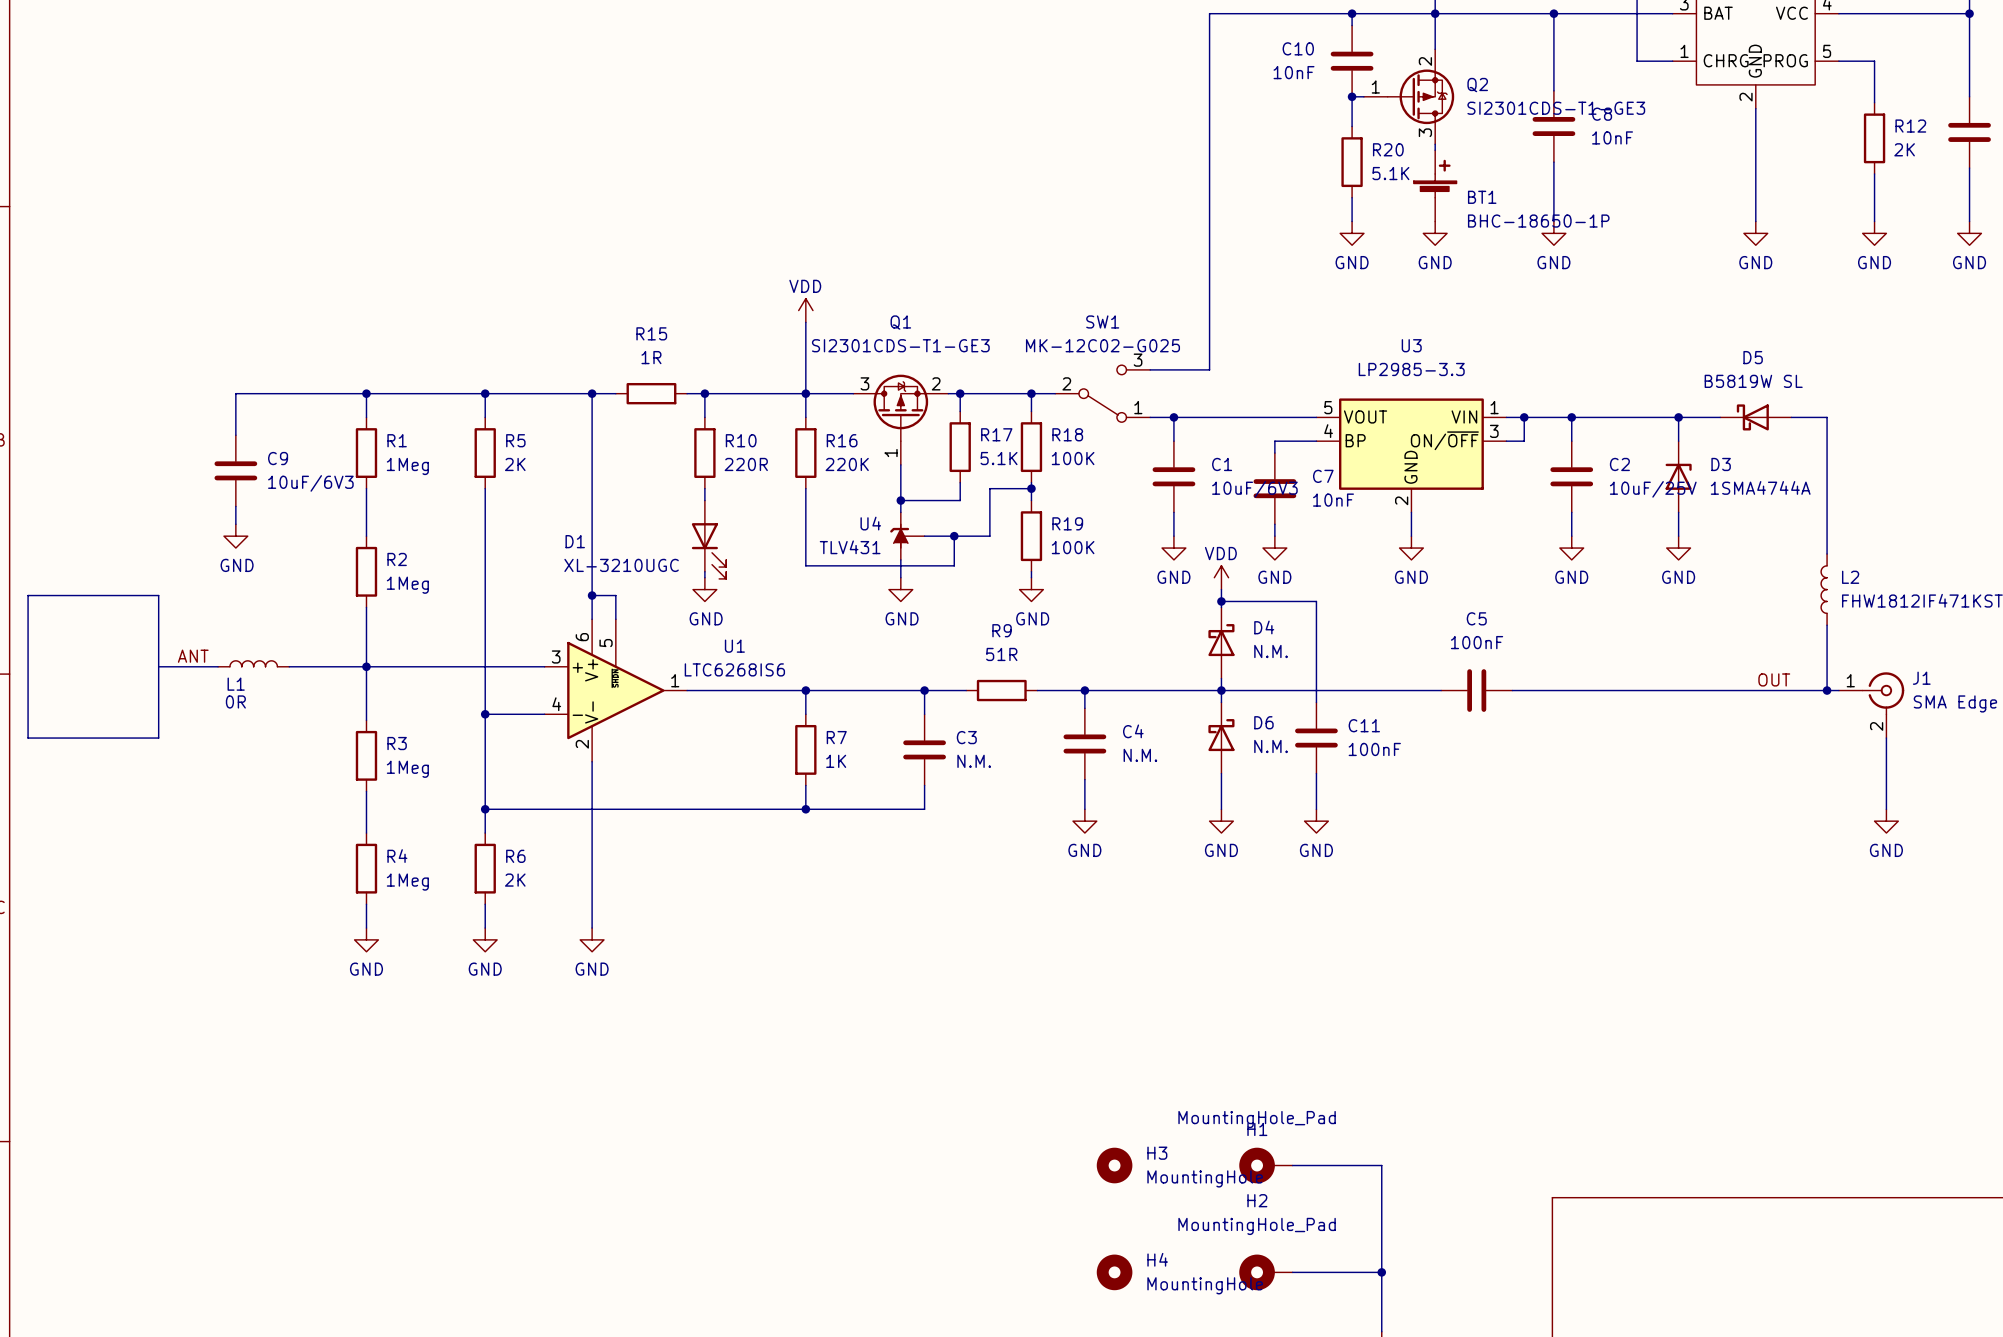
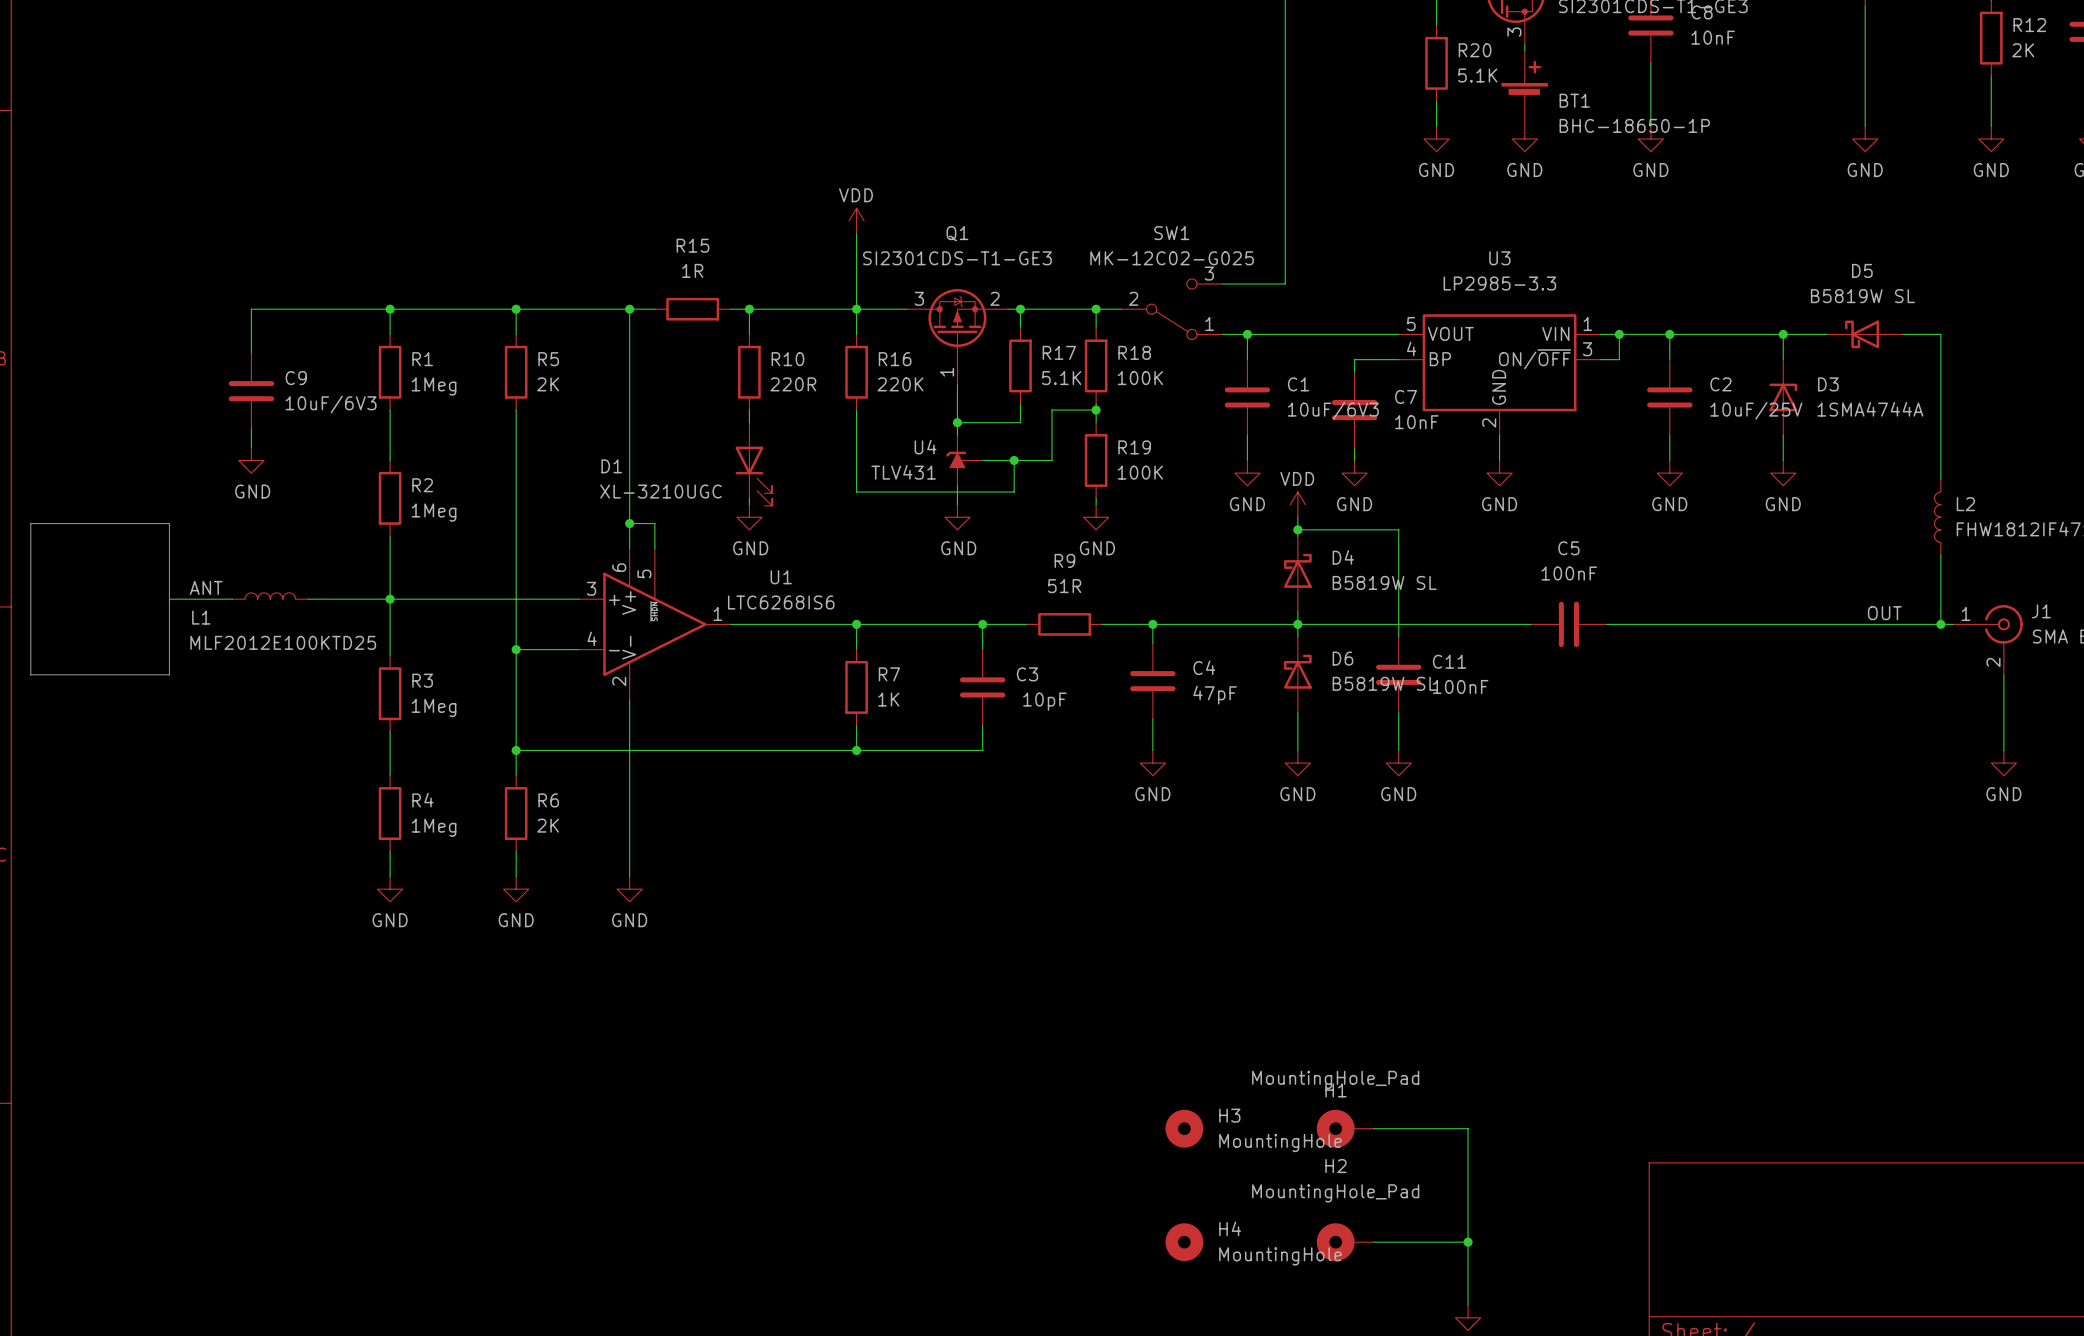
D4 value: N.M. (1271, 651) -> B5819W SL (1384, 582)
L1 name position: L1 (236, 684) -> L1 (201, 617)
L1 value: 0R (235, 701) -> MLF2012E100KTD25 (283, 642)
D6 value: N.M. (1271, 746) -> B5819W SL (1384, 683)
C4 value: N.M. (1140, 755) -> 47pF (1215, 695)
C3 value: N.M. (974, 761) -> 10pF (1044, 701)

